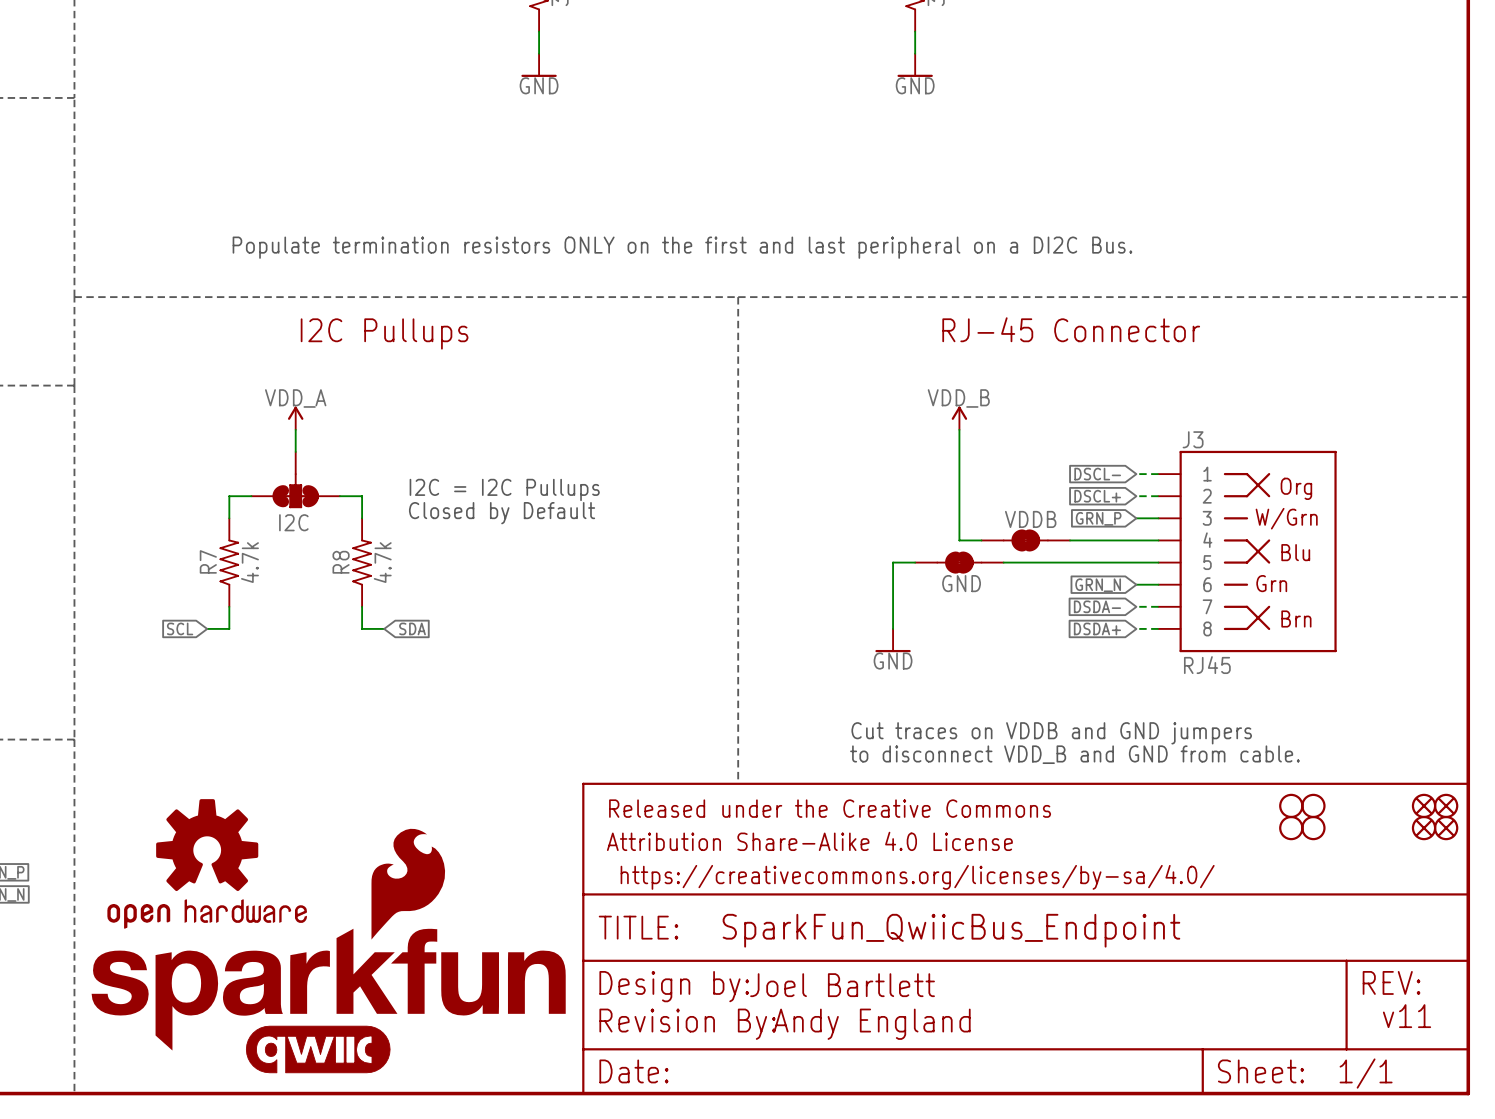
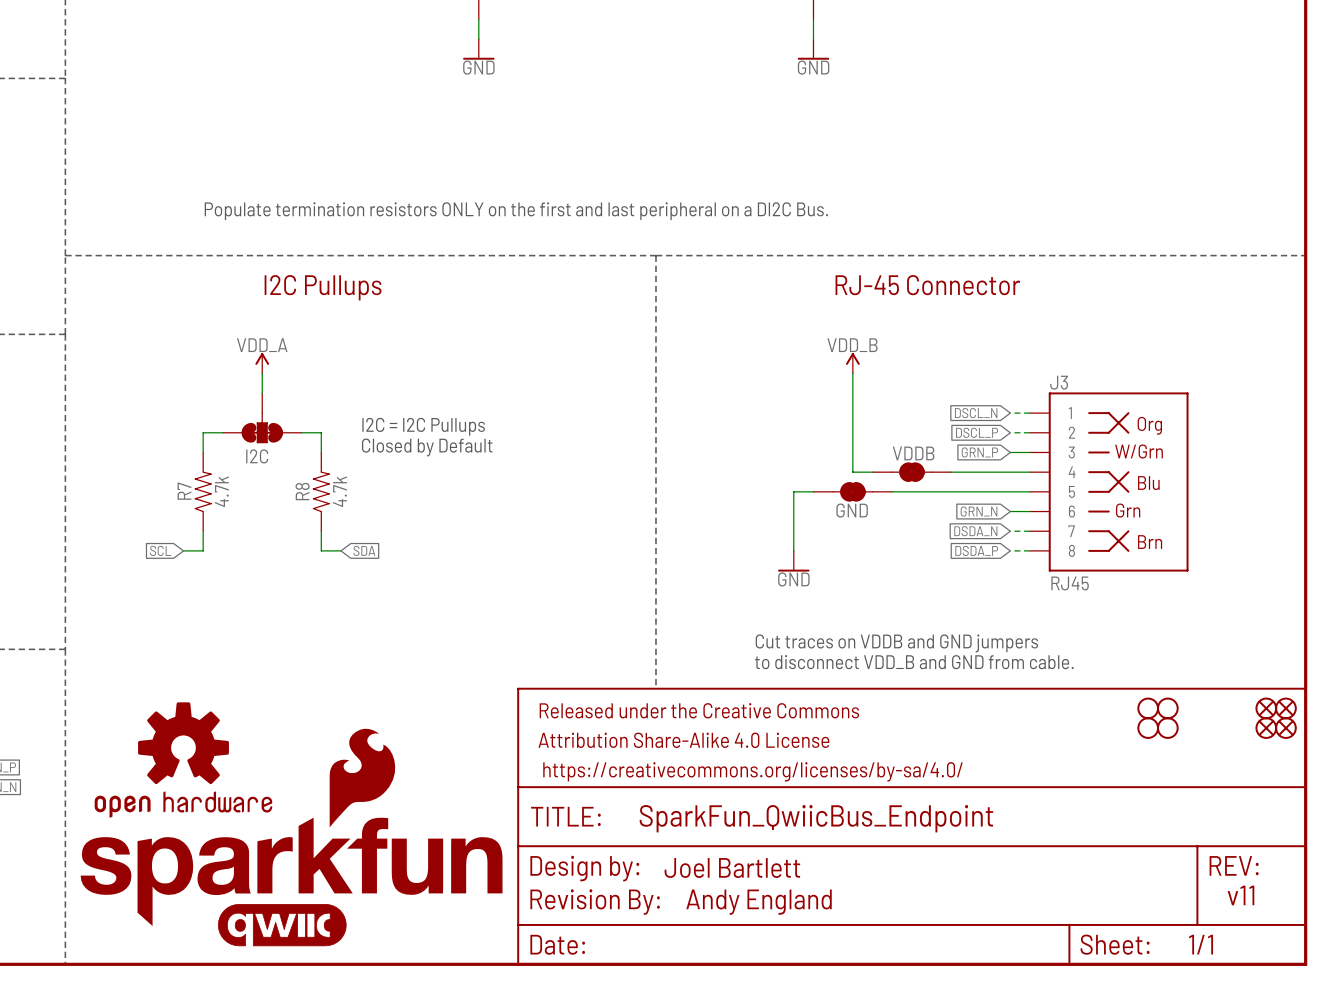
global label: DSCL- (1097, 474) -> DSCL_N (976, 413)
global label: DSCL+ (1097, 496) -> DSCL_P (977, 432)
global label: DSDA- (1097, 606) -> DSDA_N (975, 531)
global label: DSDA+ (1097, 628) -> DSDA_P (976, 550)

